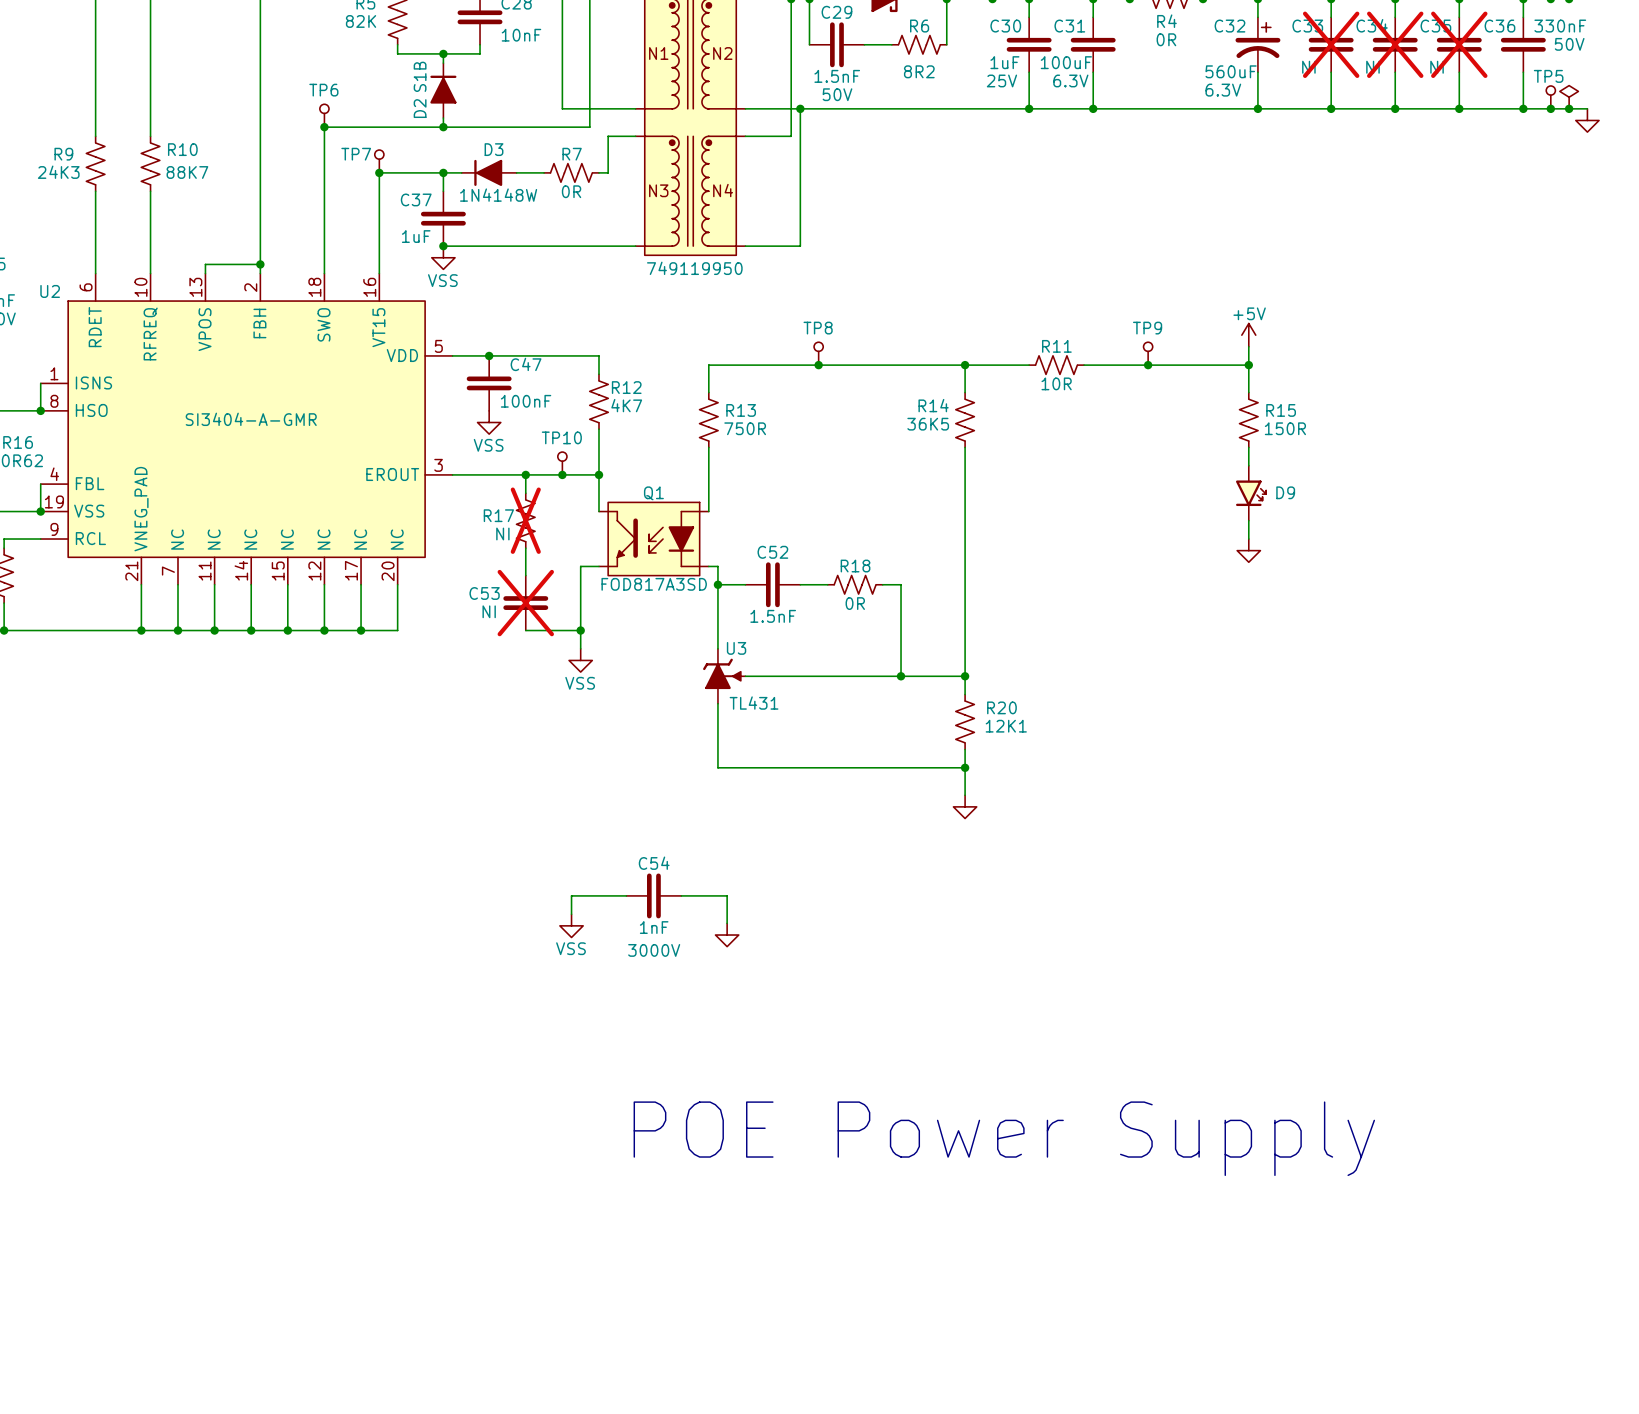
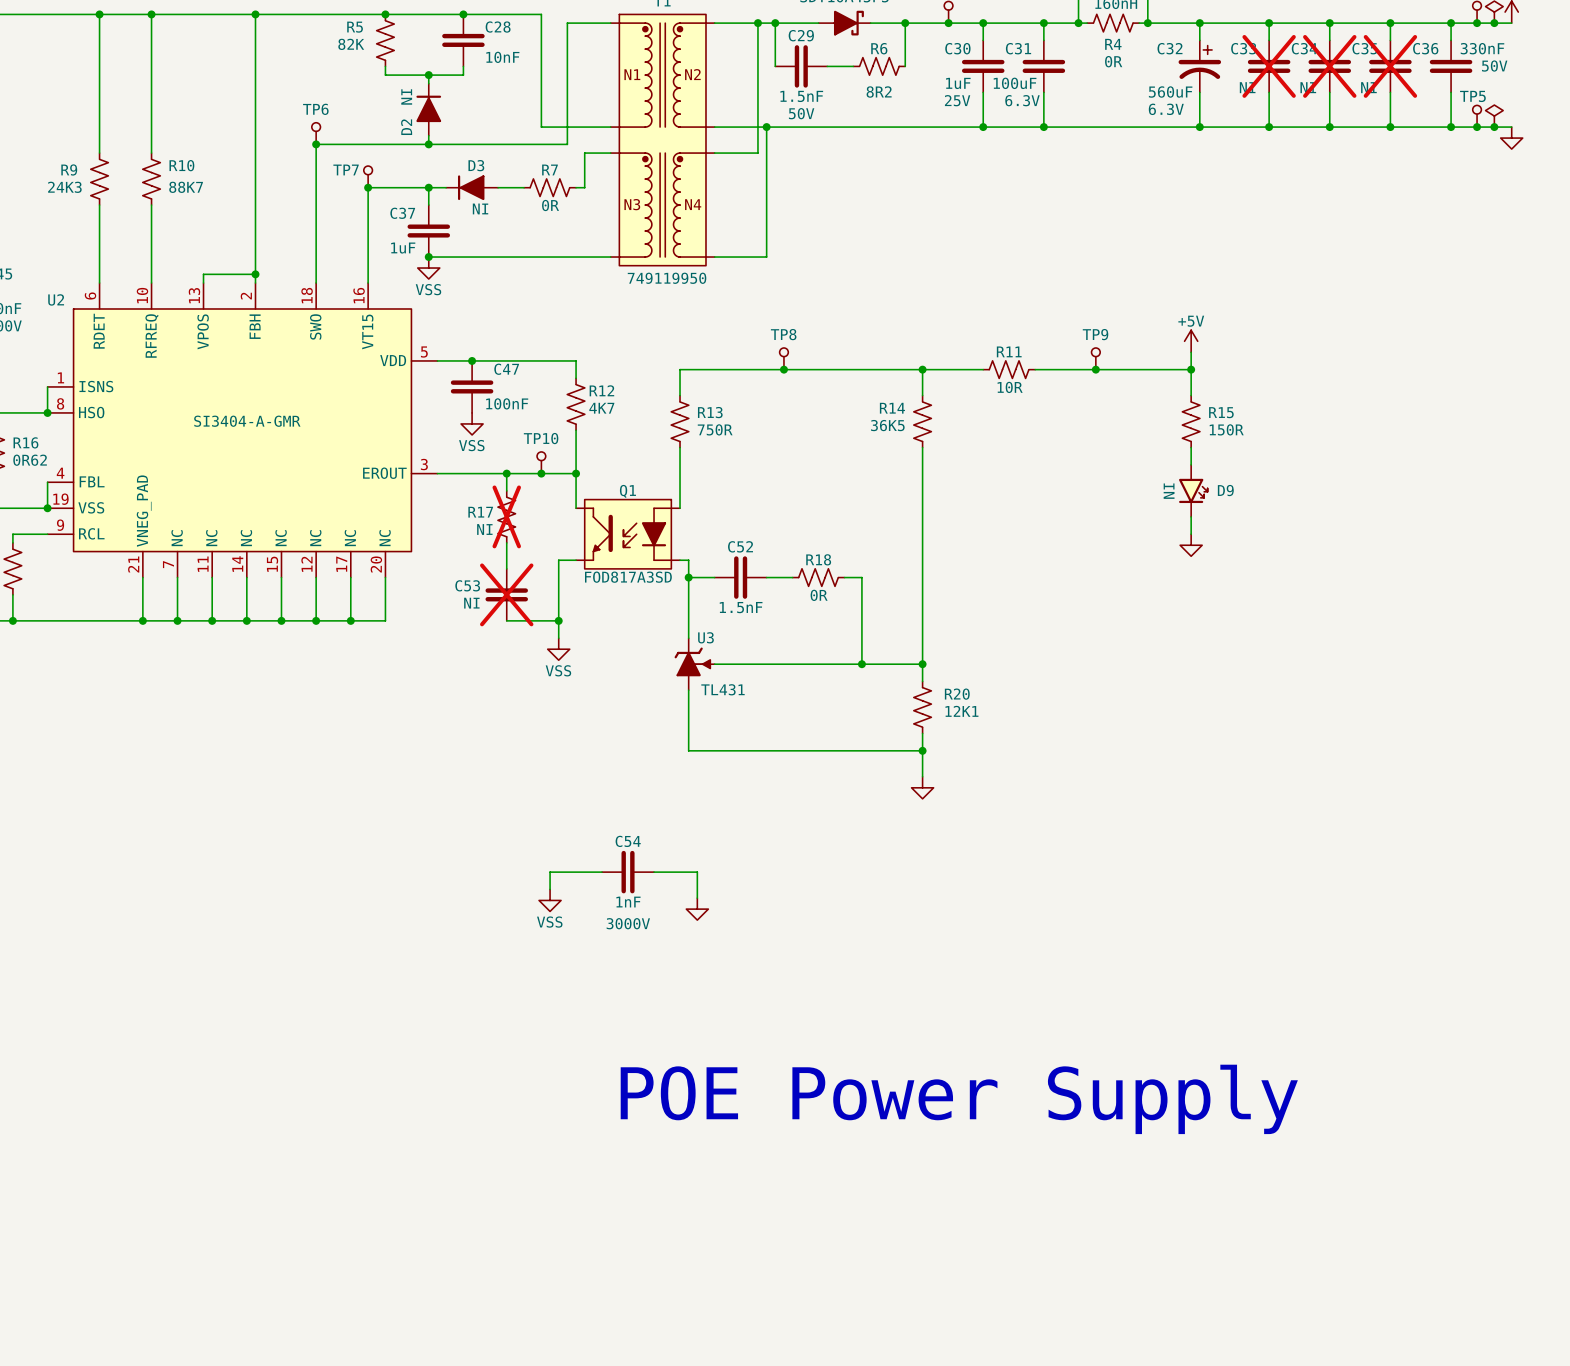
D2 text: S1B (420, 76) -> NI (406, 96)
D3 text: 1N4148W (498, 195) -> NI (480, 208)
D9 text: none -> NI (1169, 491)

